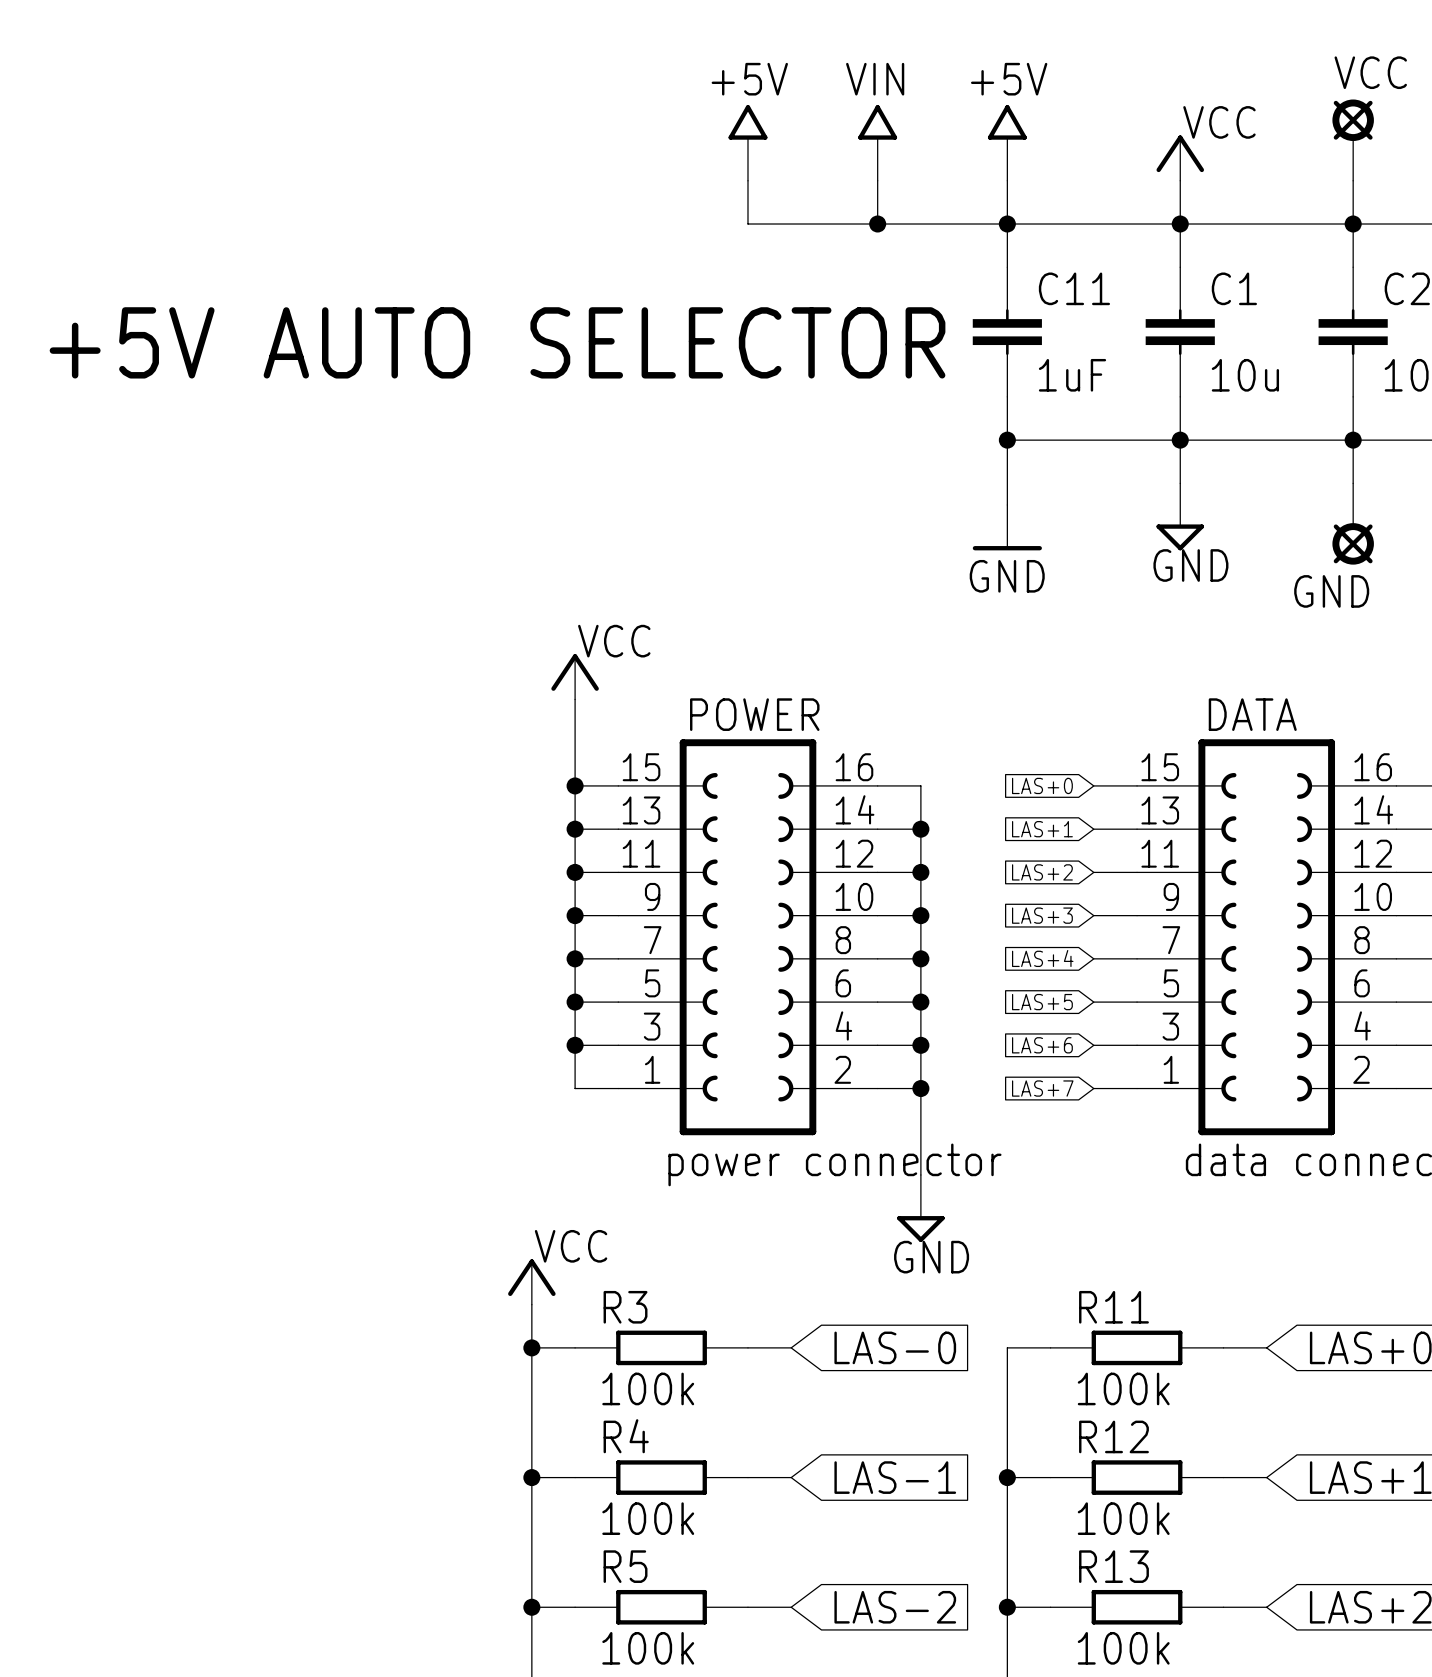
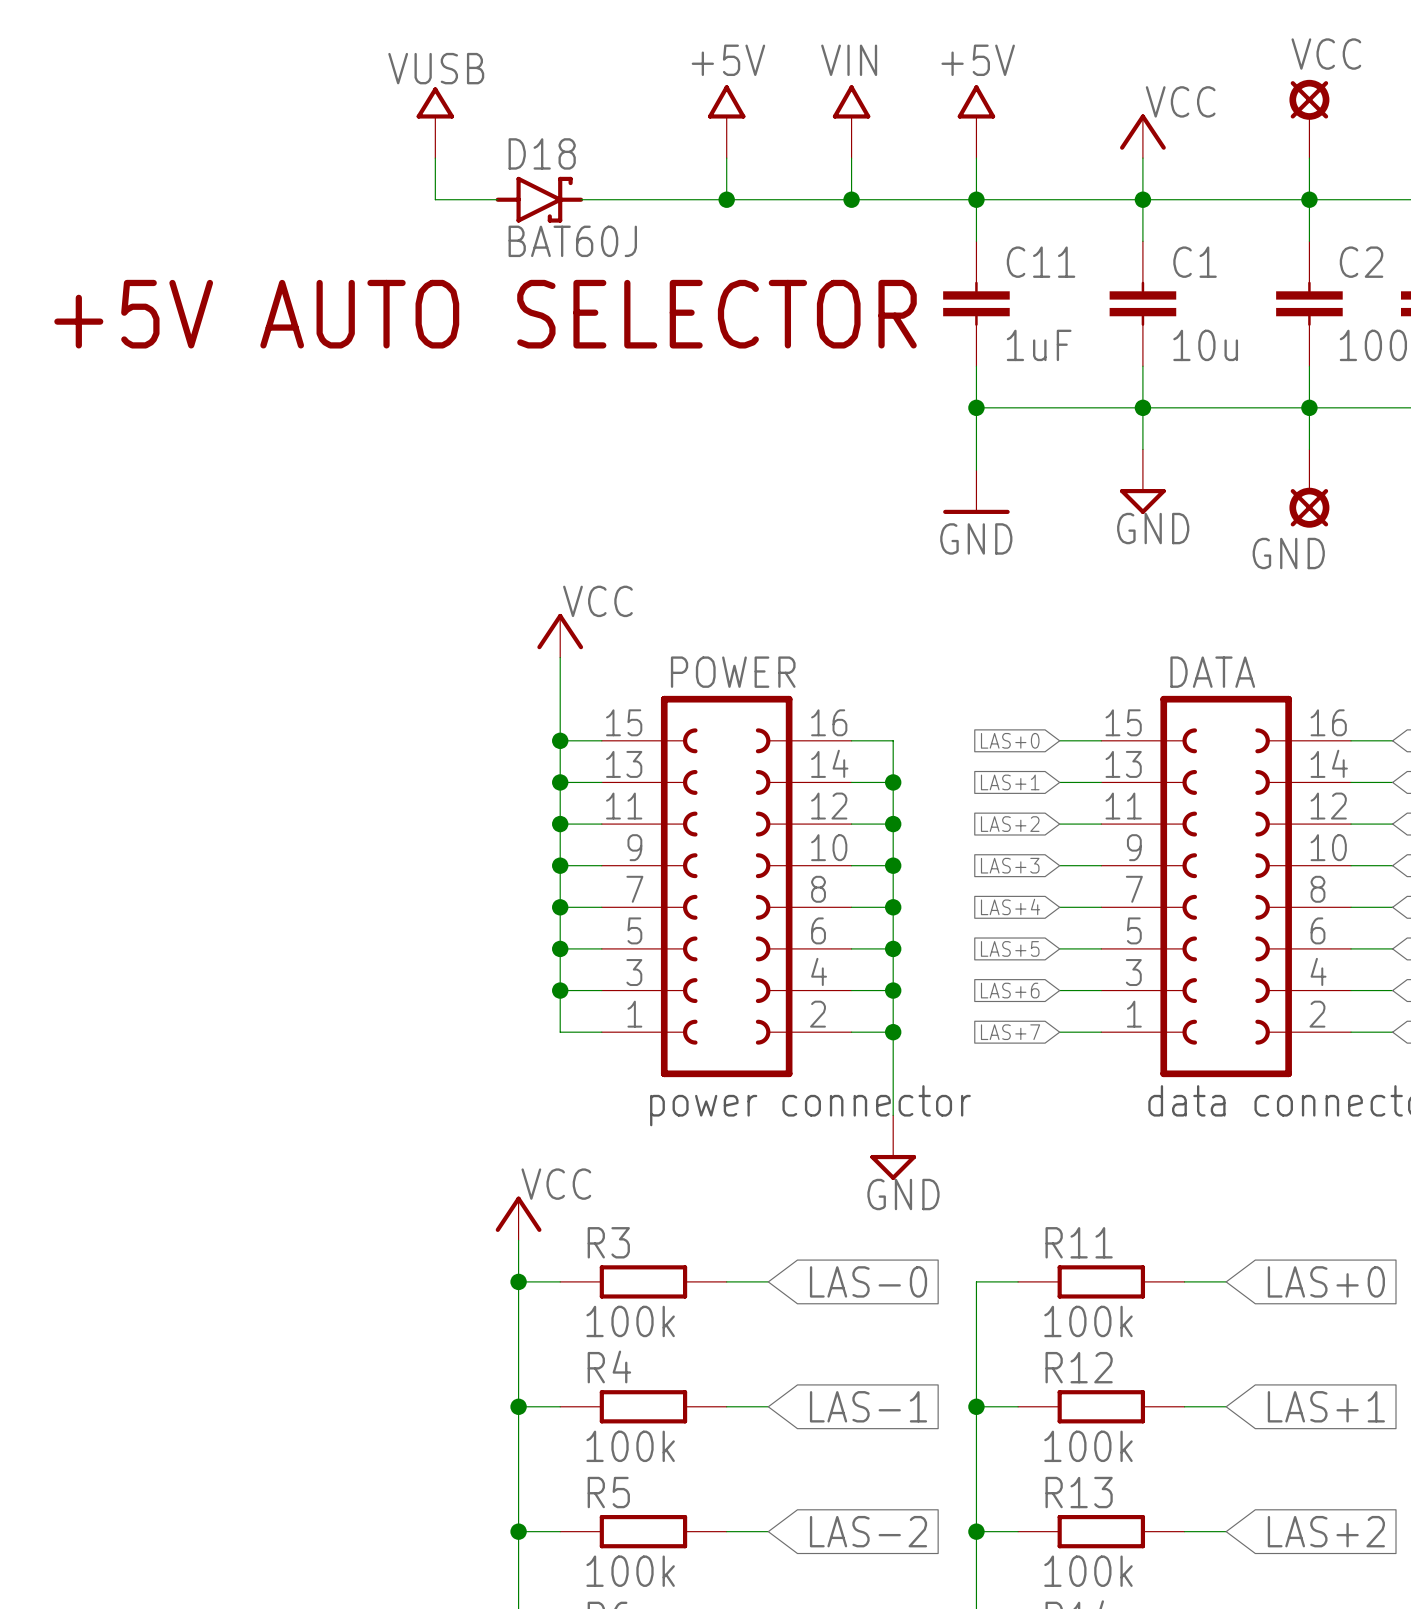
power symbol: none -> VUSB (435, 122)
wire: none -> (435, 158) (435, 199) (497, 199)
D18: none -> BAT60J (539, 199)
wire: none -> (581, 199) (726, 199)
junction: none -> (726, 199)

